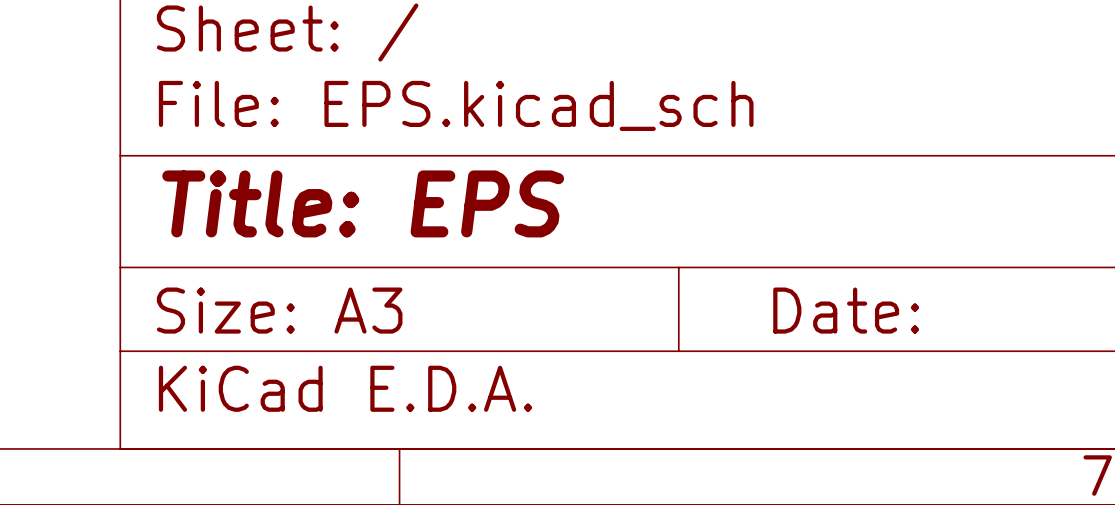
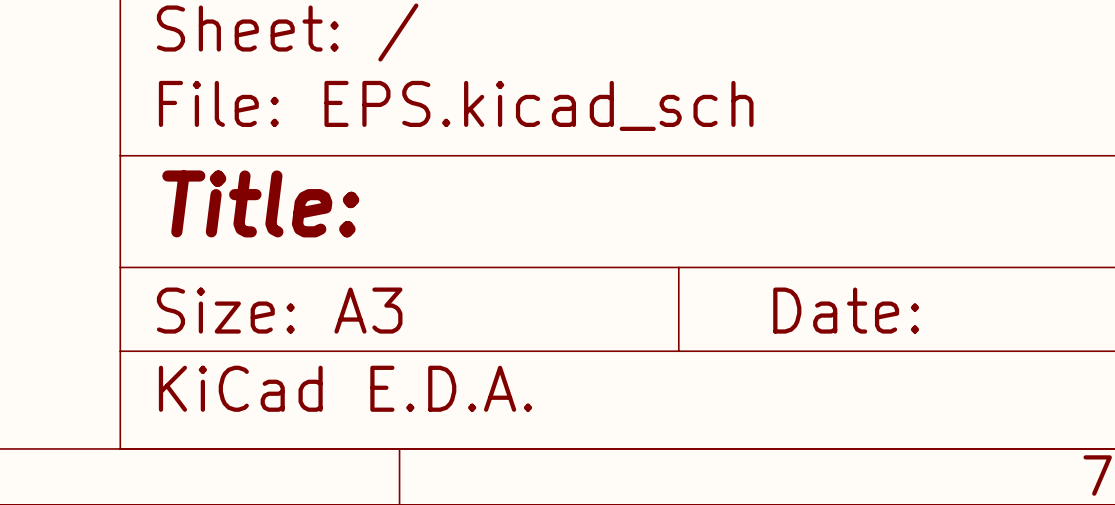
title block: Title: EPS (363, 203) -> Title: (260, 203)

